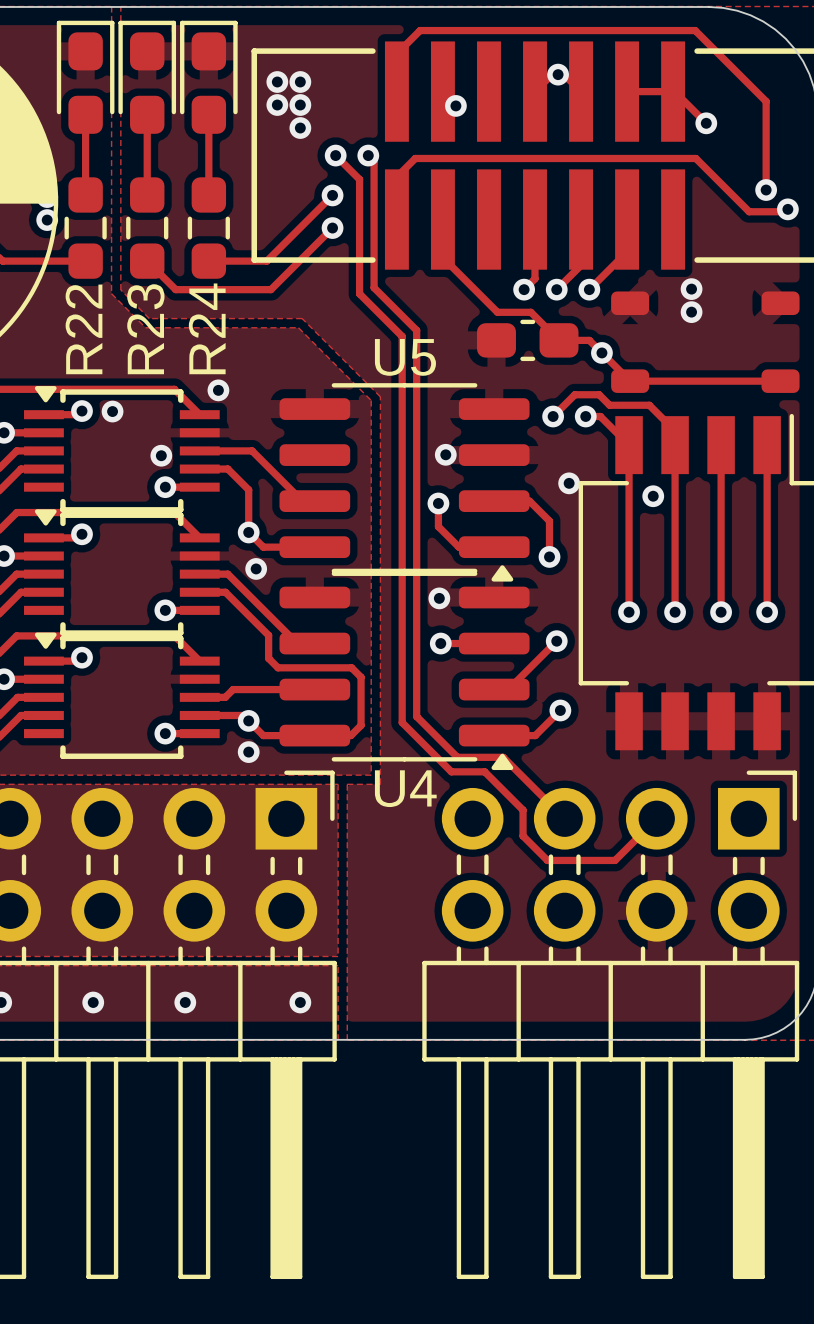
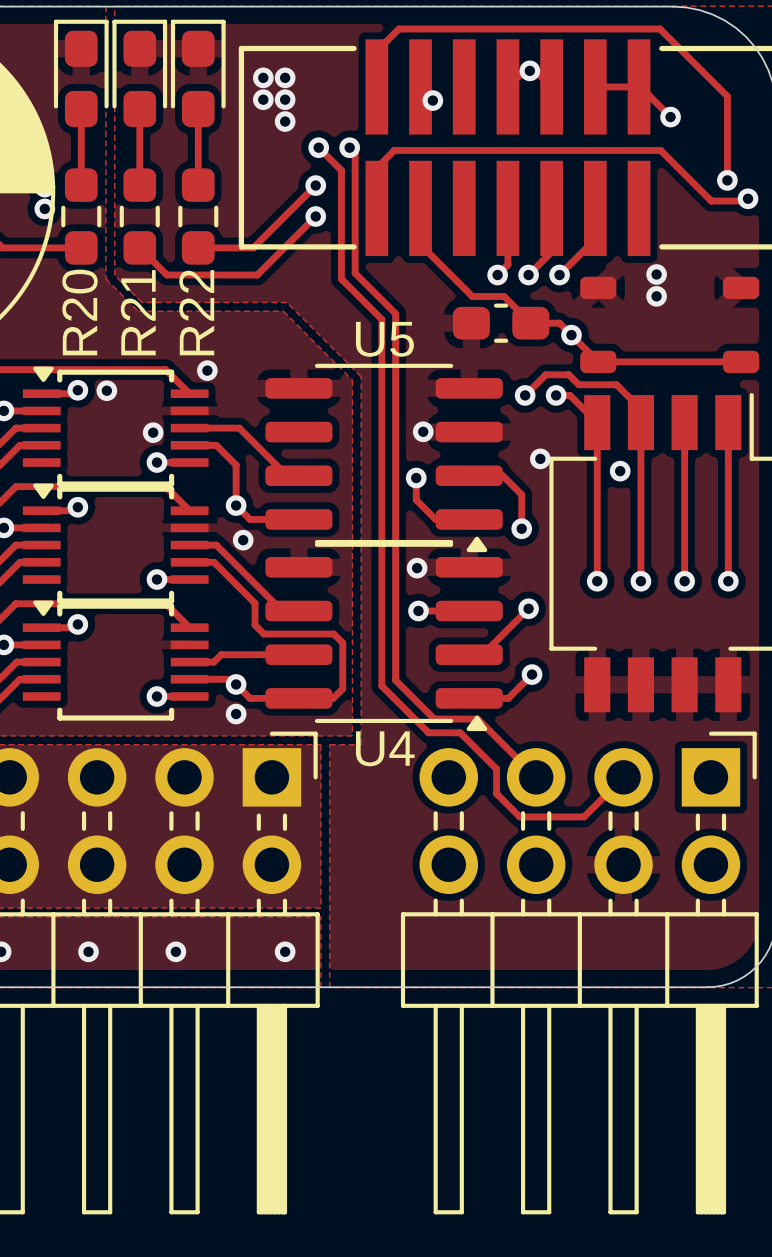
R24 name: R24 (207, 328) -> R22 (196, 312)
R22 name: R22 (83, 329) -> R20 (79, 312)
R23 name: R23 (145, 329) -> R21 (138, 312)

